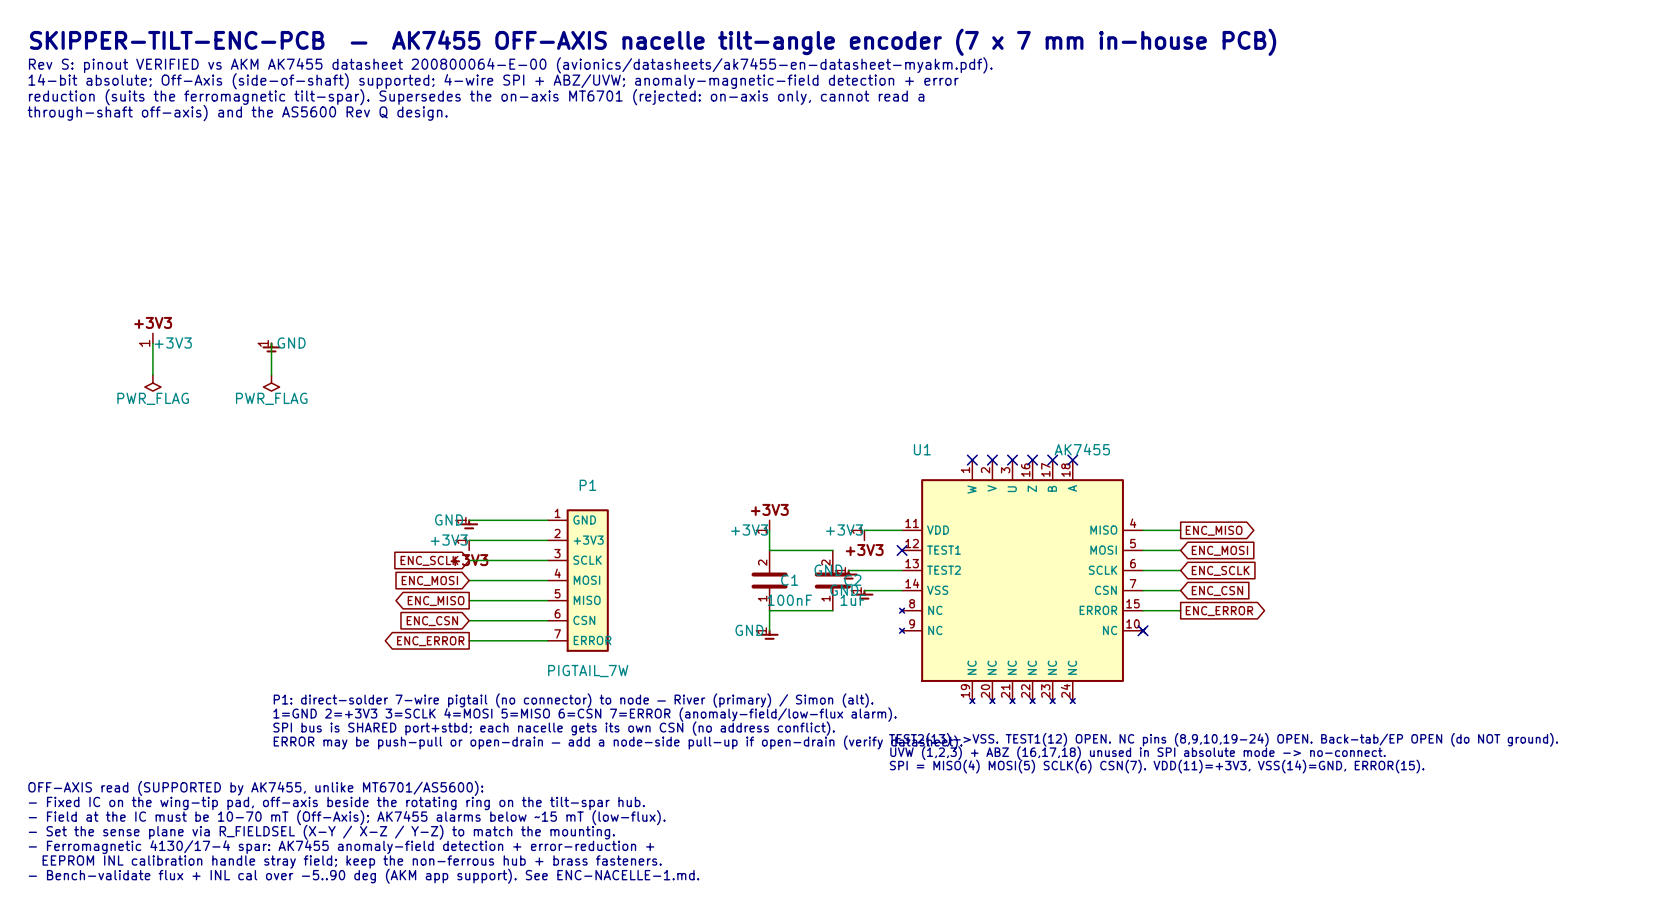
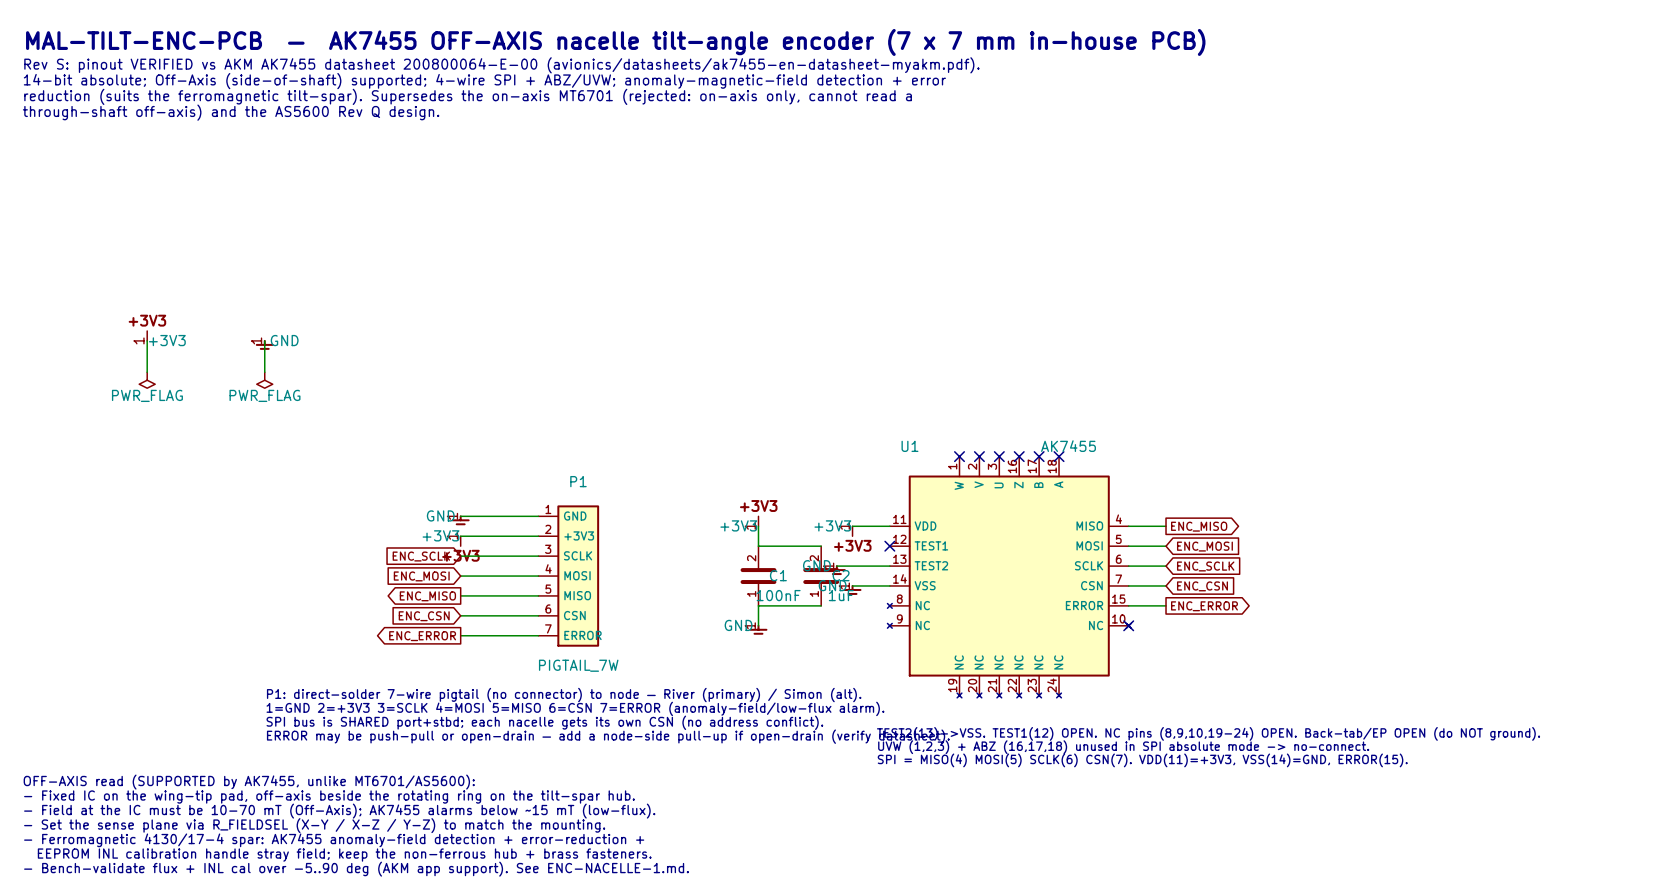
text: SKIPPER-TILT-ENC-PCB — AK7455 OFF-AXIS nacelle tilt-angle encoder (7 x 7 mm in-house PCB) (653, 42) -> MAL-TILT-ENC-PCB — AK7455 OFF-AXIS nacelle tilt-angle encoder (7 x 7 mm in-house PCB) (615, 42)

